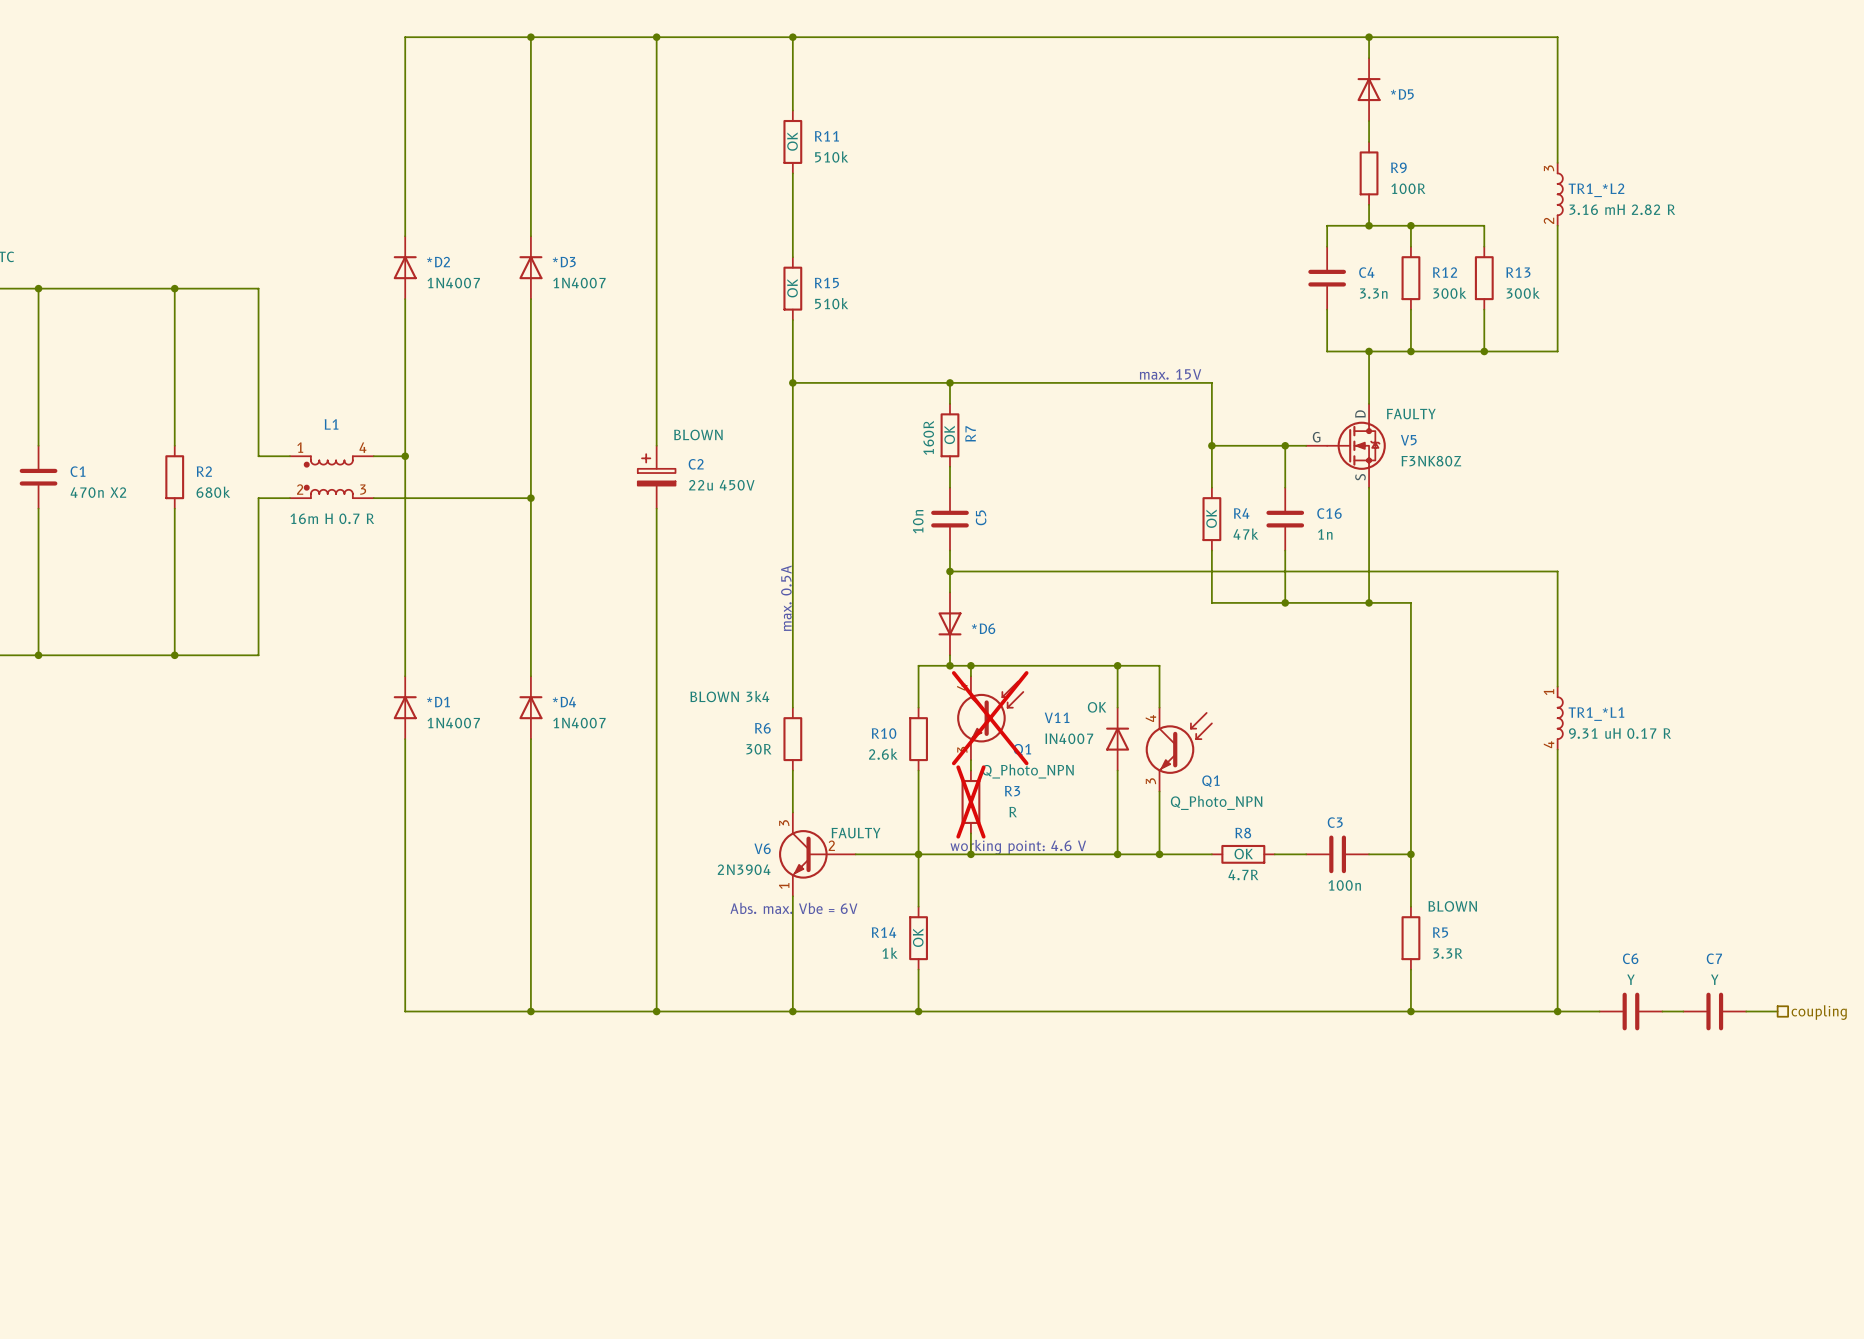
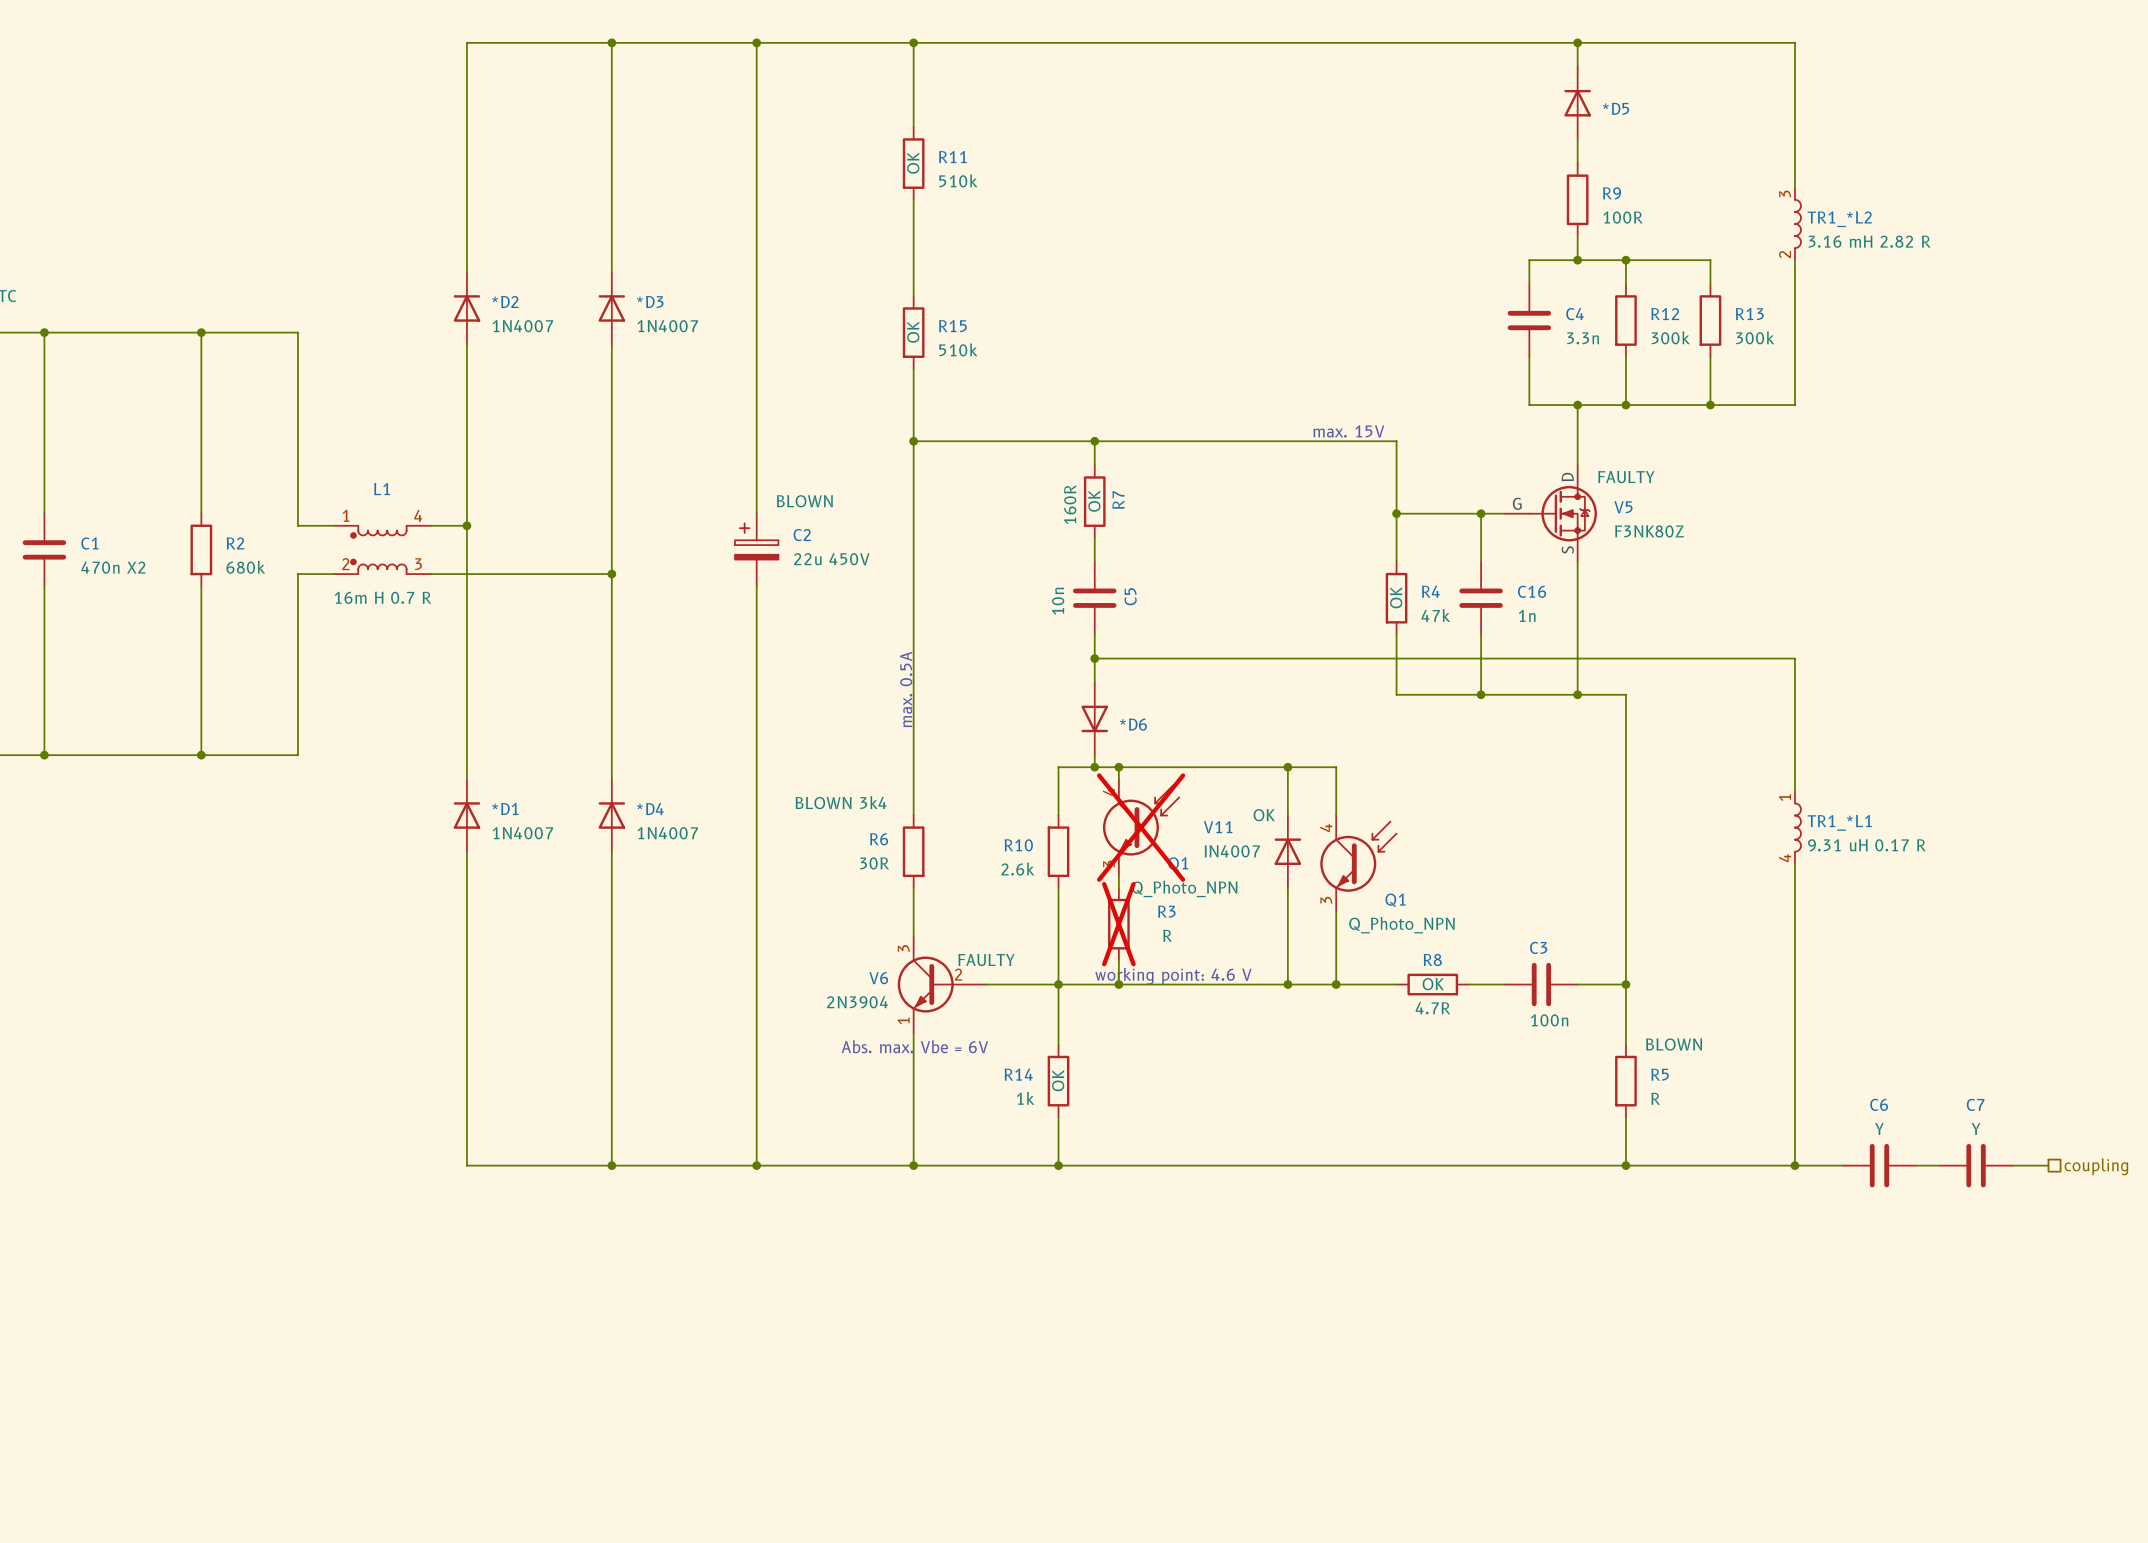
R5 value: 3.3R (1447, 953) -> R (1655, 1098)

